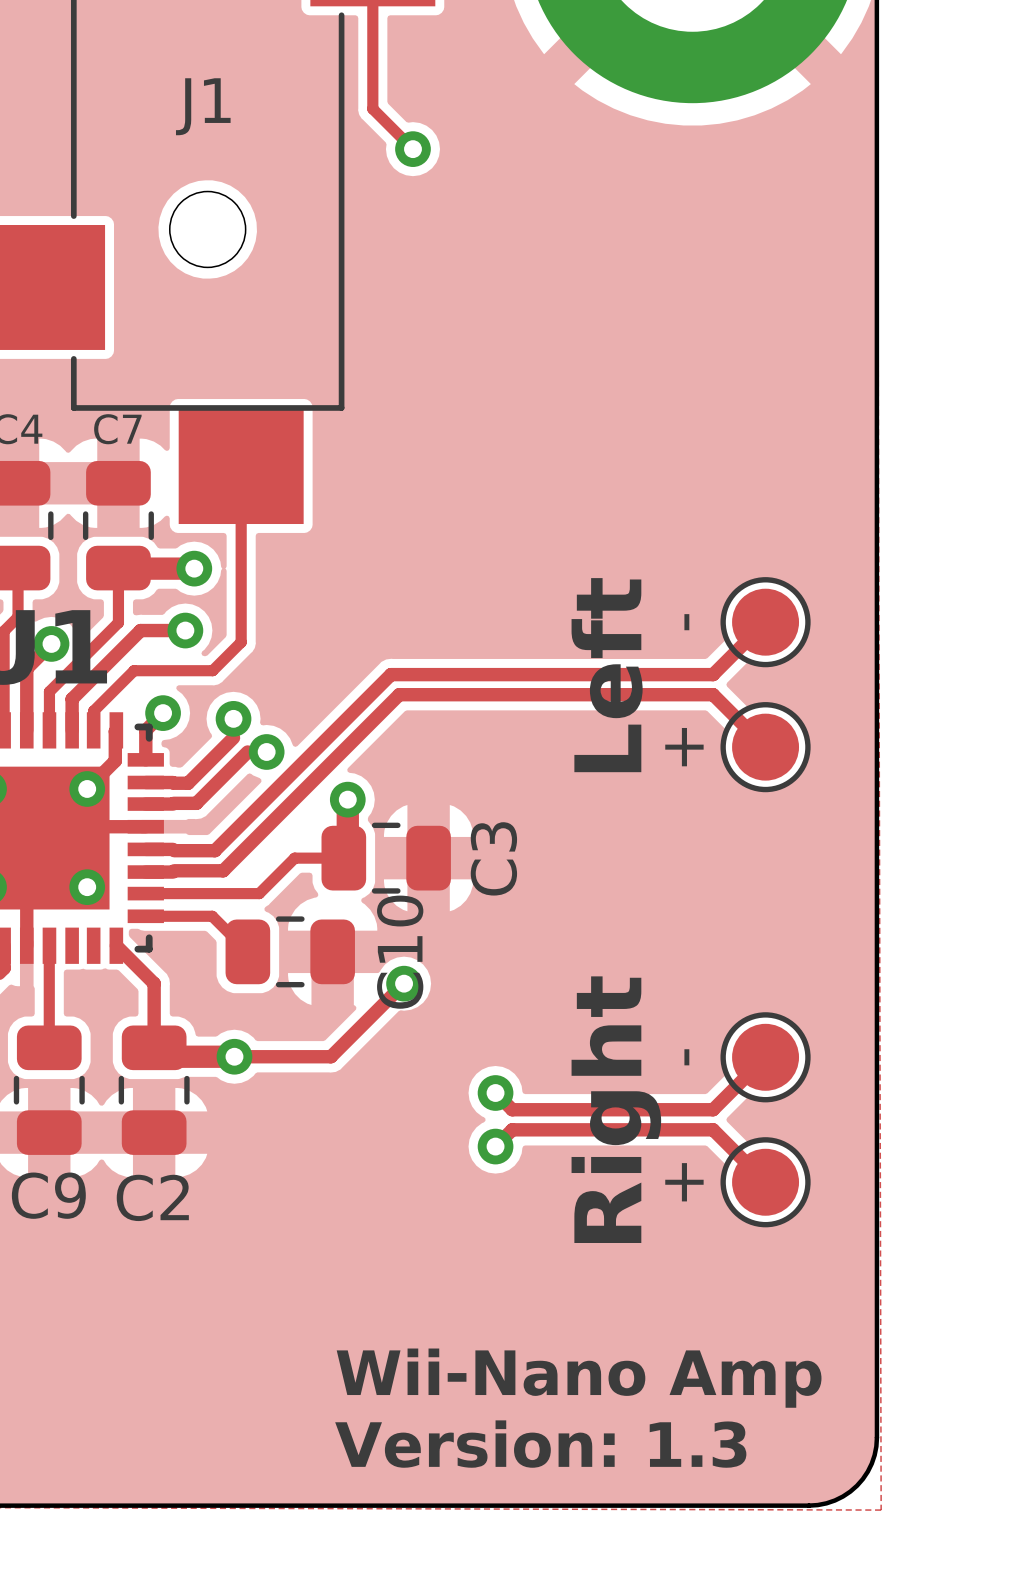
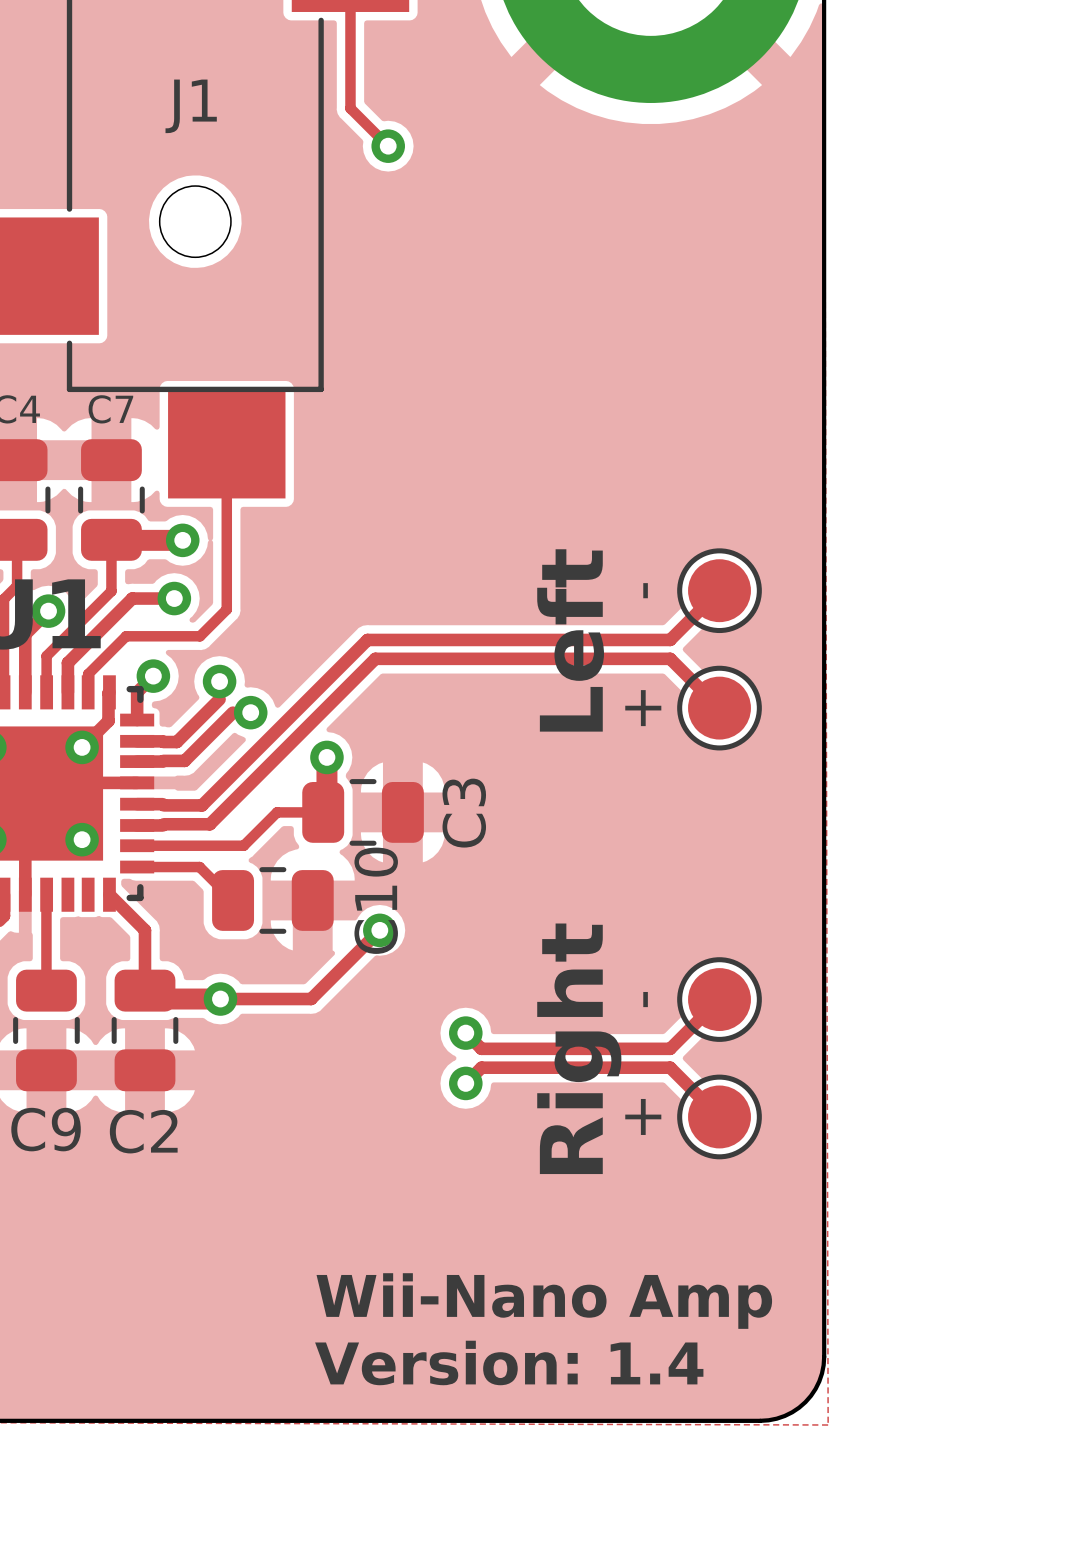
text: Version: 1.3 (540, 1444) -> Version: 1.4 (509, 1362)

